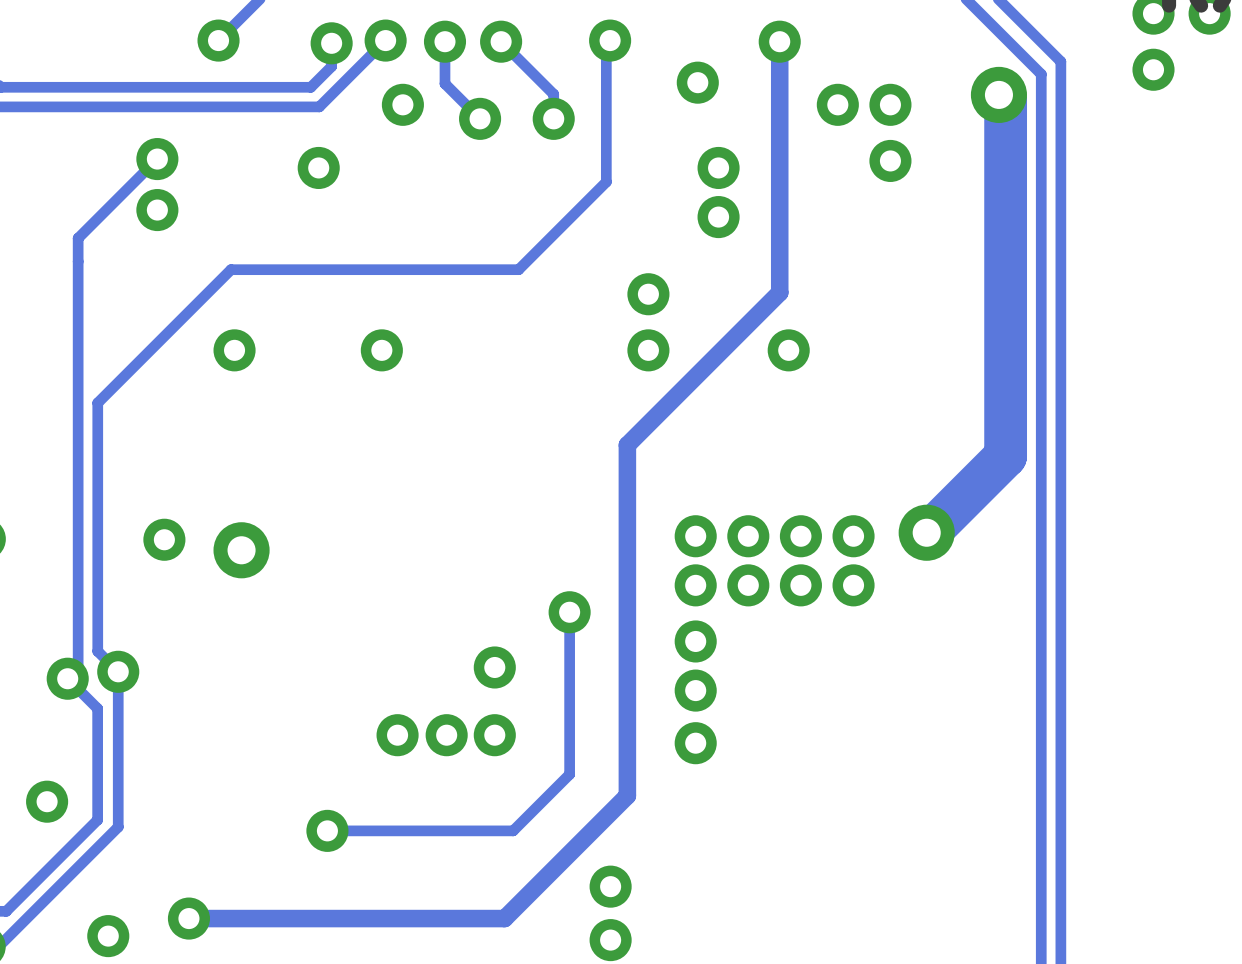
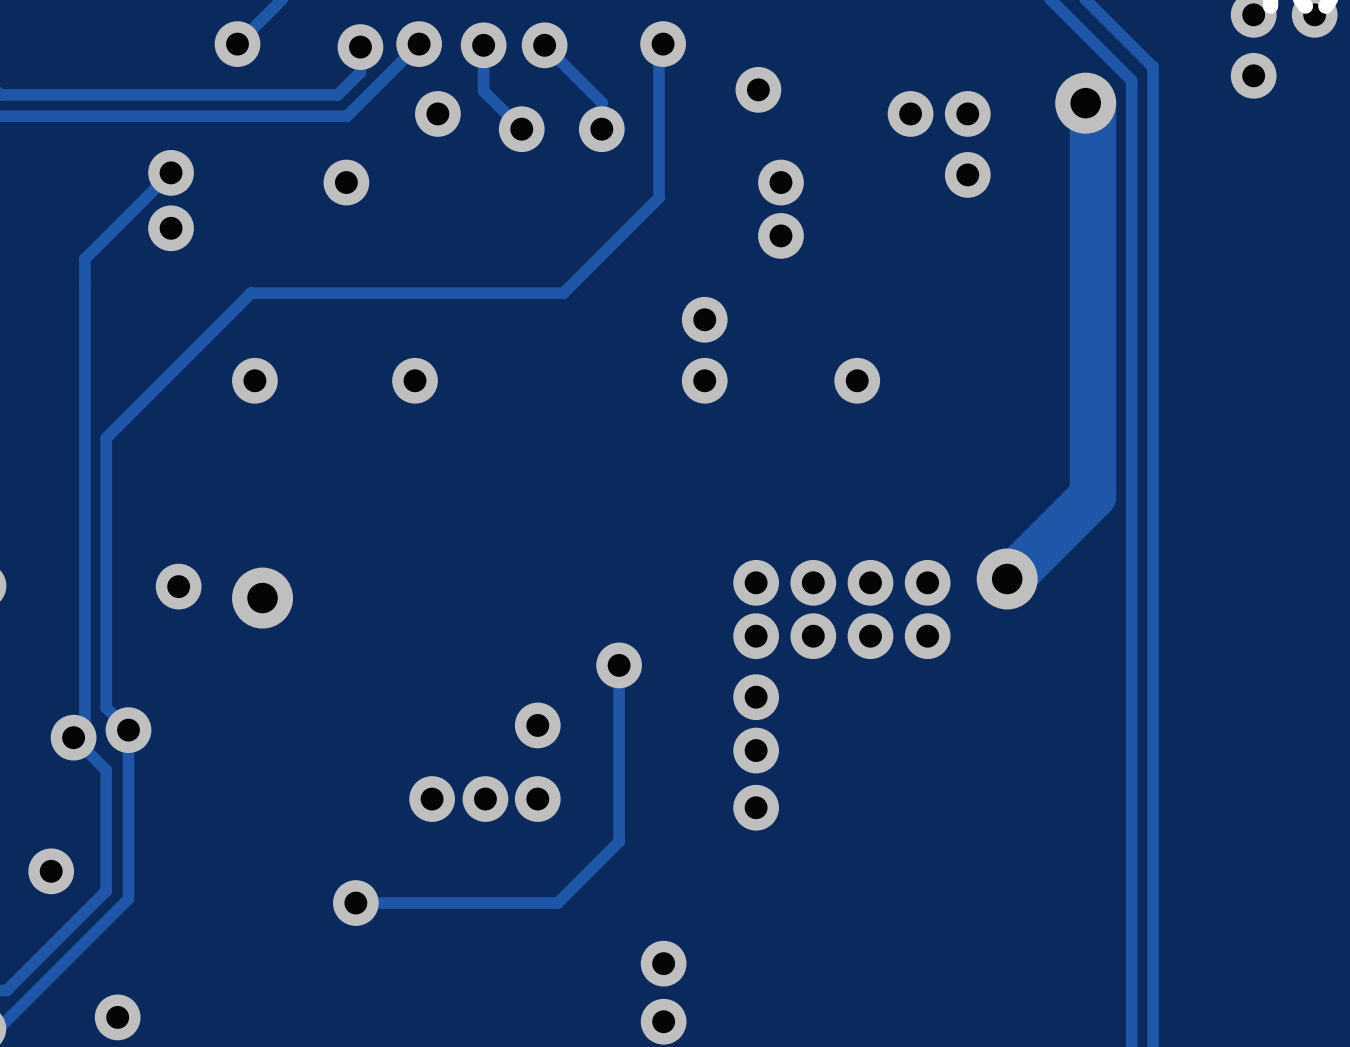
track: (779, 41) (779, 292) (627, 445) (627, 795) (504, 918) (188, 918) -> none
via: (779, 41) -> none
via: (188, 918) -> none

